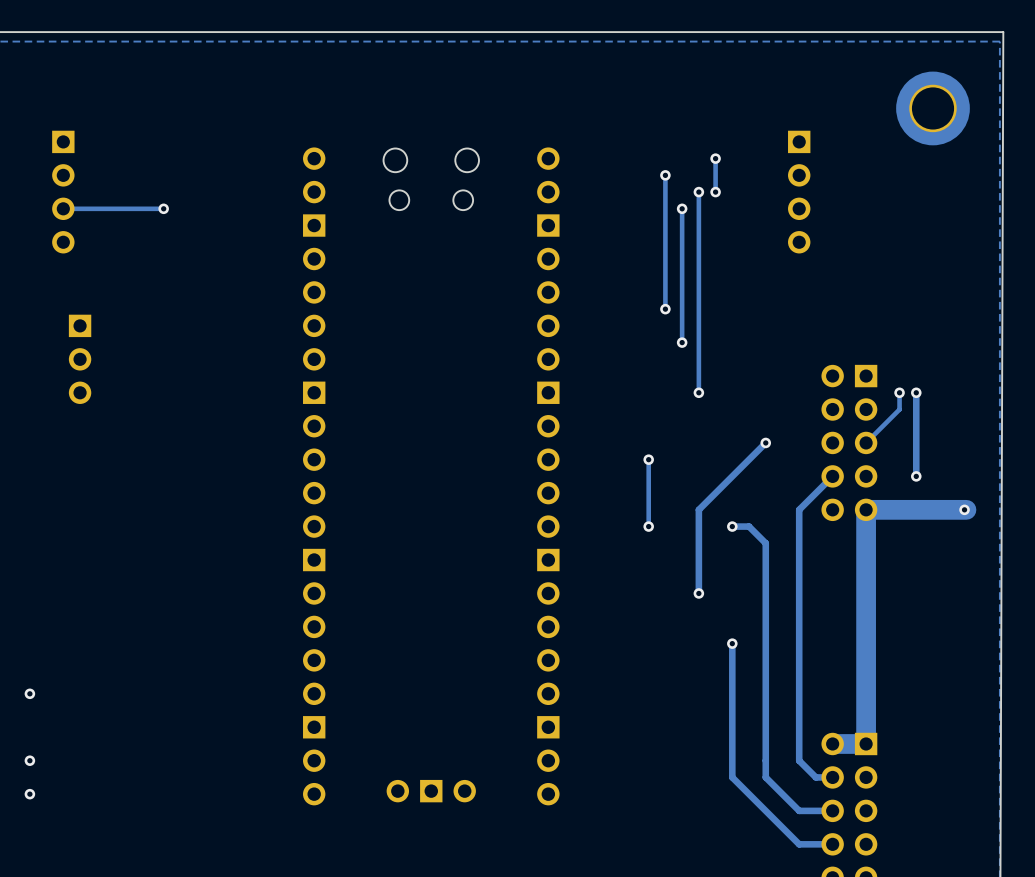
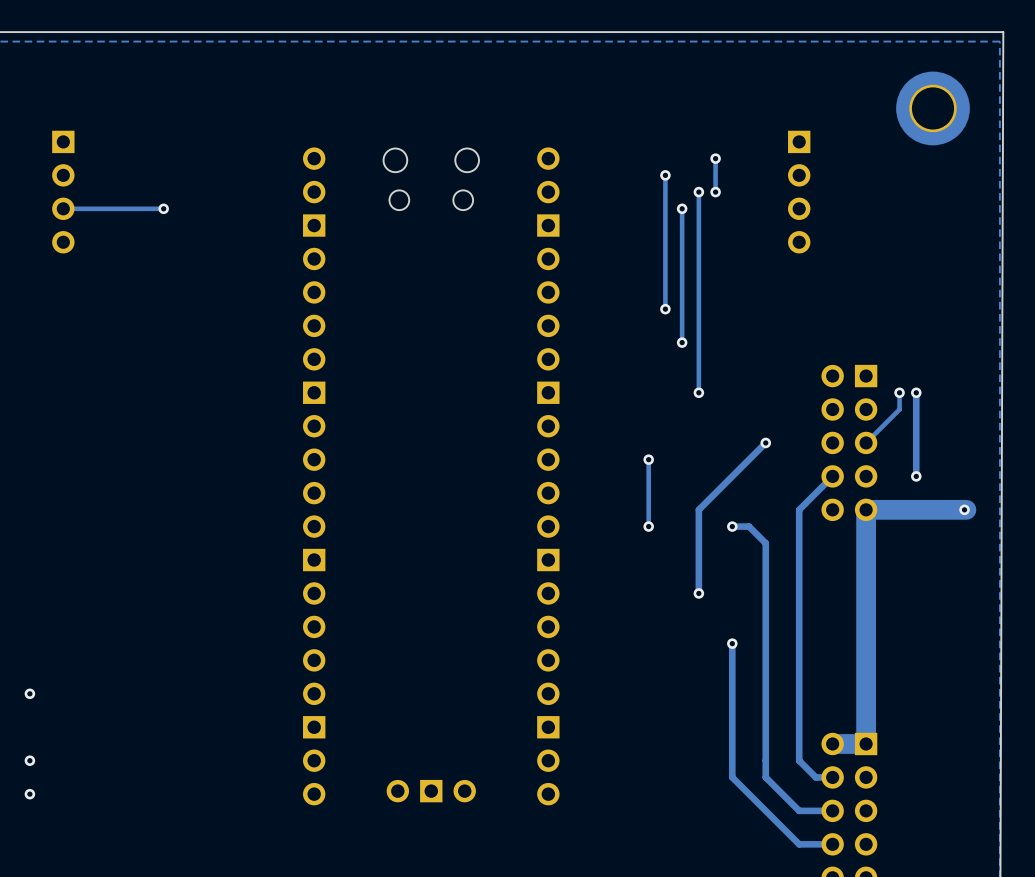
part: (80, 359) -> none

